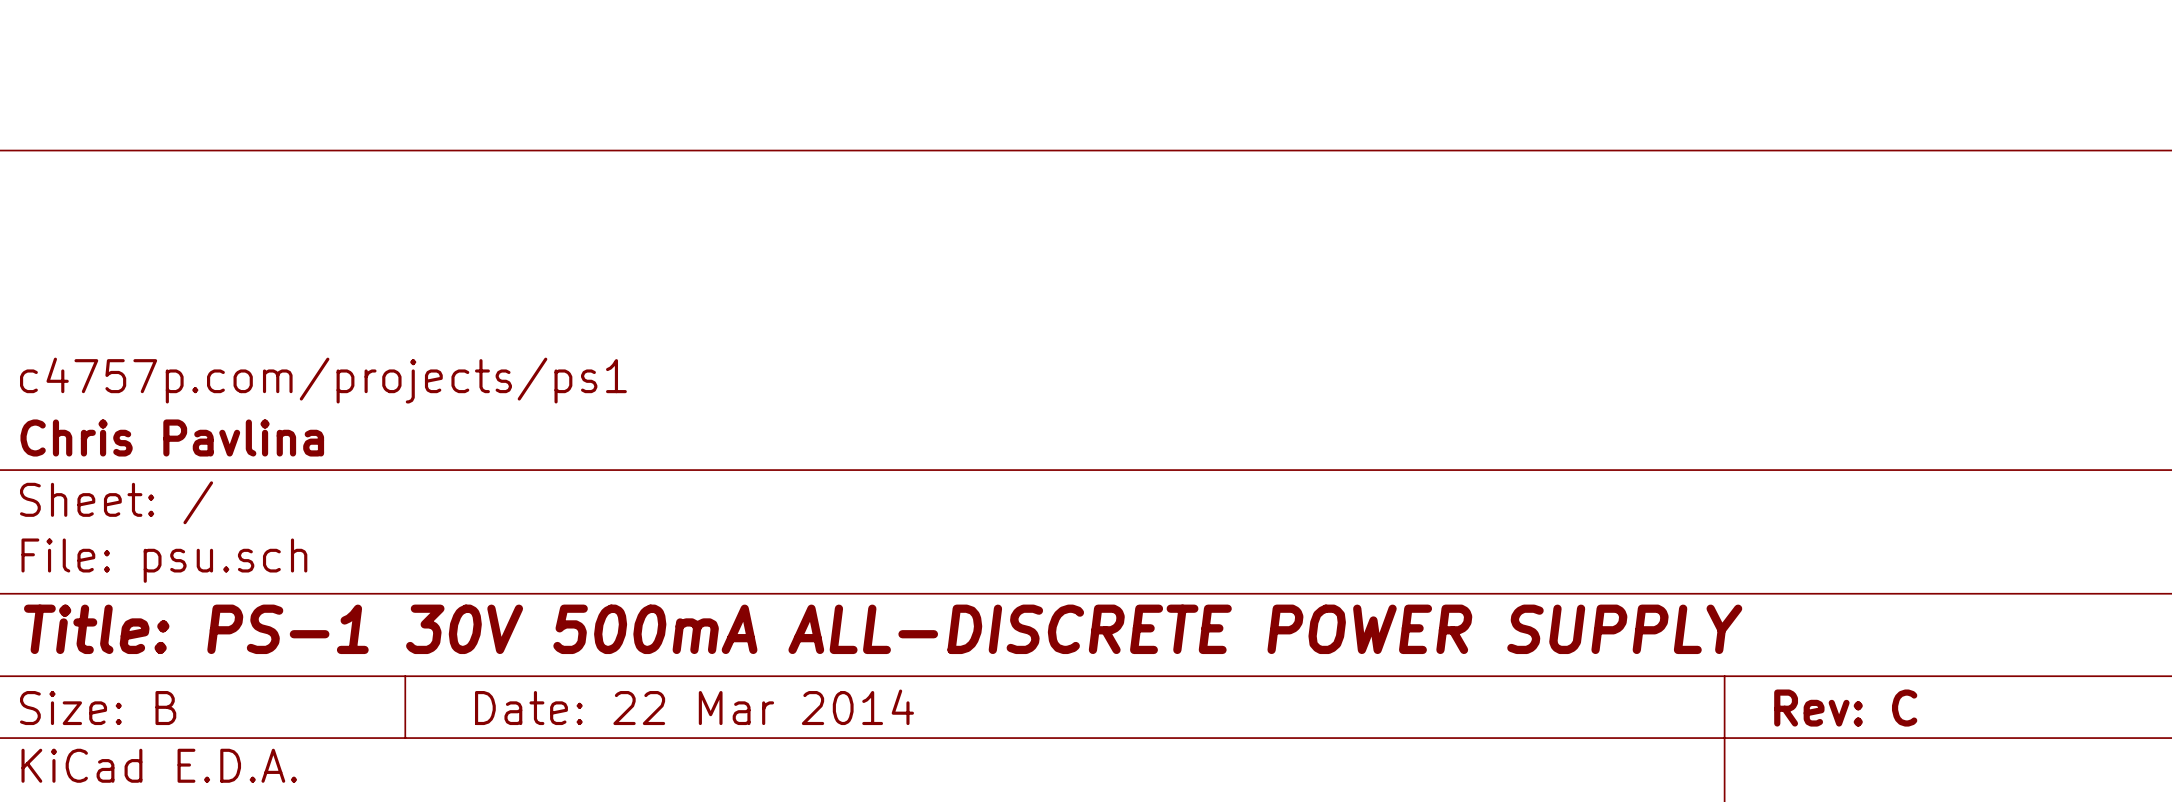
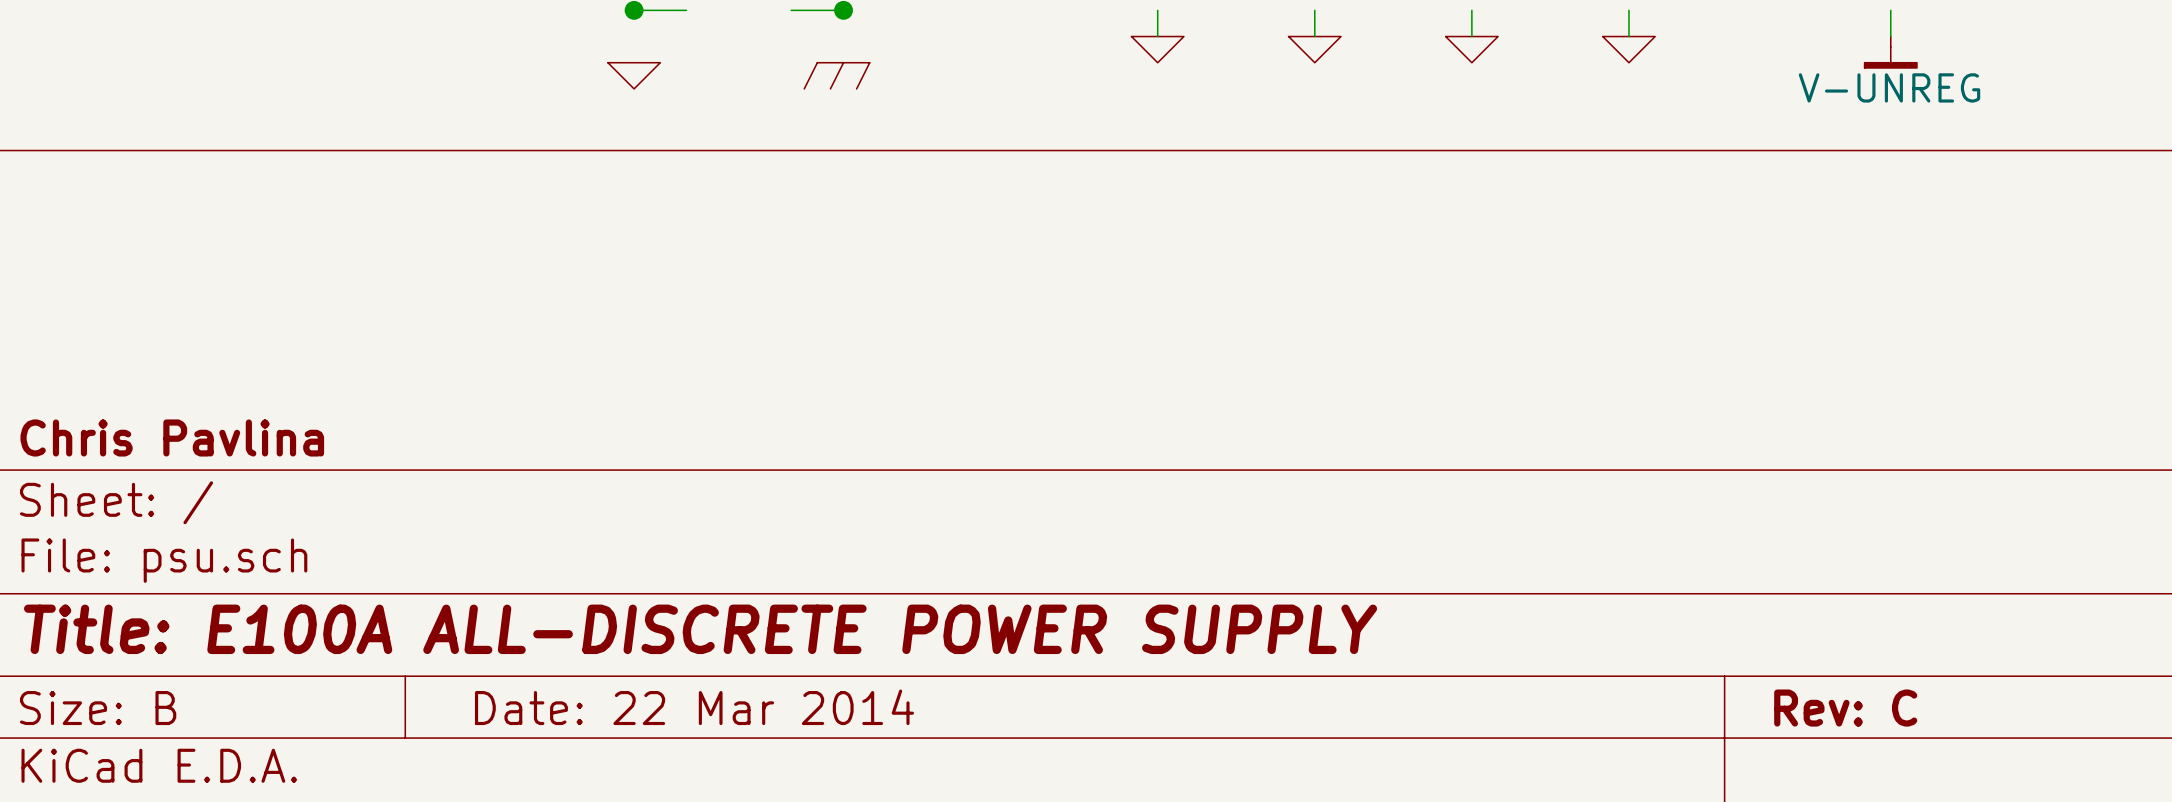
wire: none -> (634, 10) (686, 10)
junction: none -> (634, 10)
wire: none -> (791, 10) (843, 10)
junction: none -> (843, 10)
wire: none -> (1157, 10) (1157, 36)
wire: none -> (1314, 10) (1314, 36)
wire: none -> (1471, 10) (1471, 36)
wire: none -> (1628, 10) (1628, 36)
wire: none -> (1890, 10) (1890, 36)
power symbol: none -> (1157, 49)
power symbol: none -> (1314, 49)
power symbol: none -> (1471, 49)
power symbol: none -> (1628, 49)
power symbol: none -> V-UNREG (1890, 52)
power symbol: none -> (634, 75)
power symbol: none -> (837, 75)
title block: c4757p.com/projects/ps1 (323, 380) -> none
title block: Title: PS-1 30V 500mA ALL-DISCRETE POWER SUPPLY (883, 629) -> Title: E100A ALL-DISCRETE POWER SUPPLY (700, 629)

